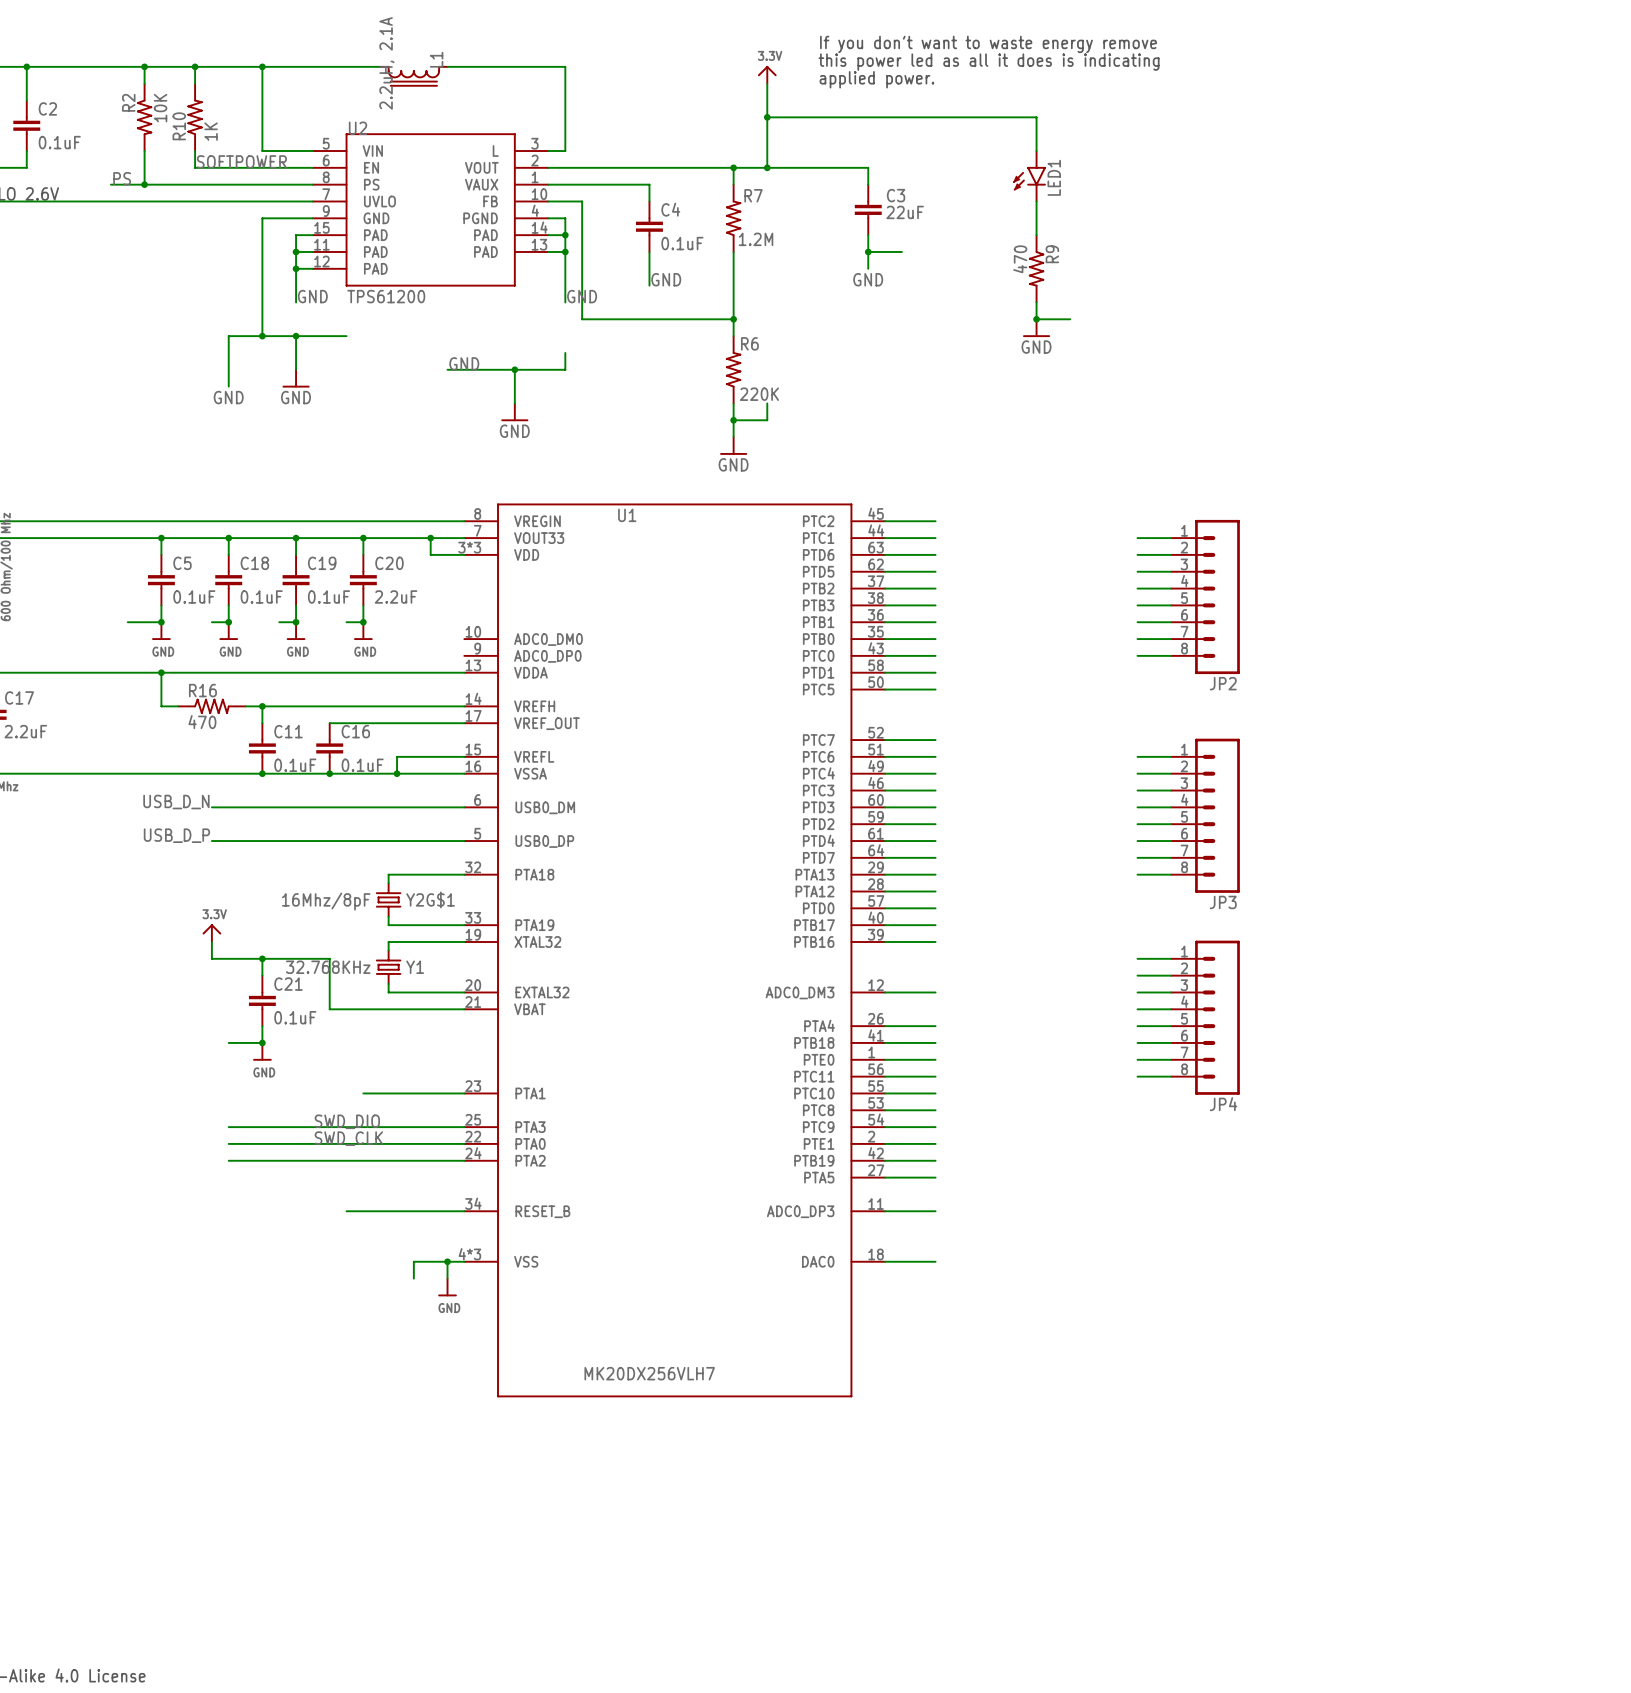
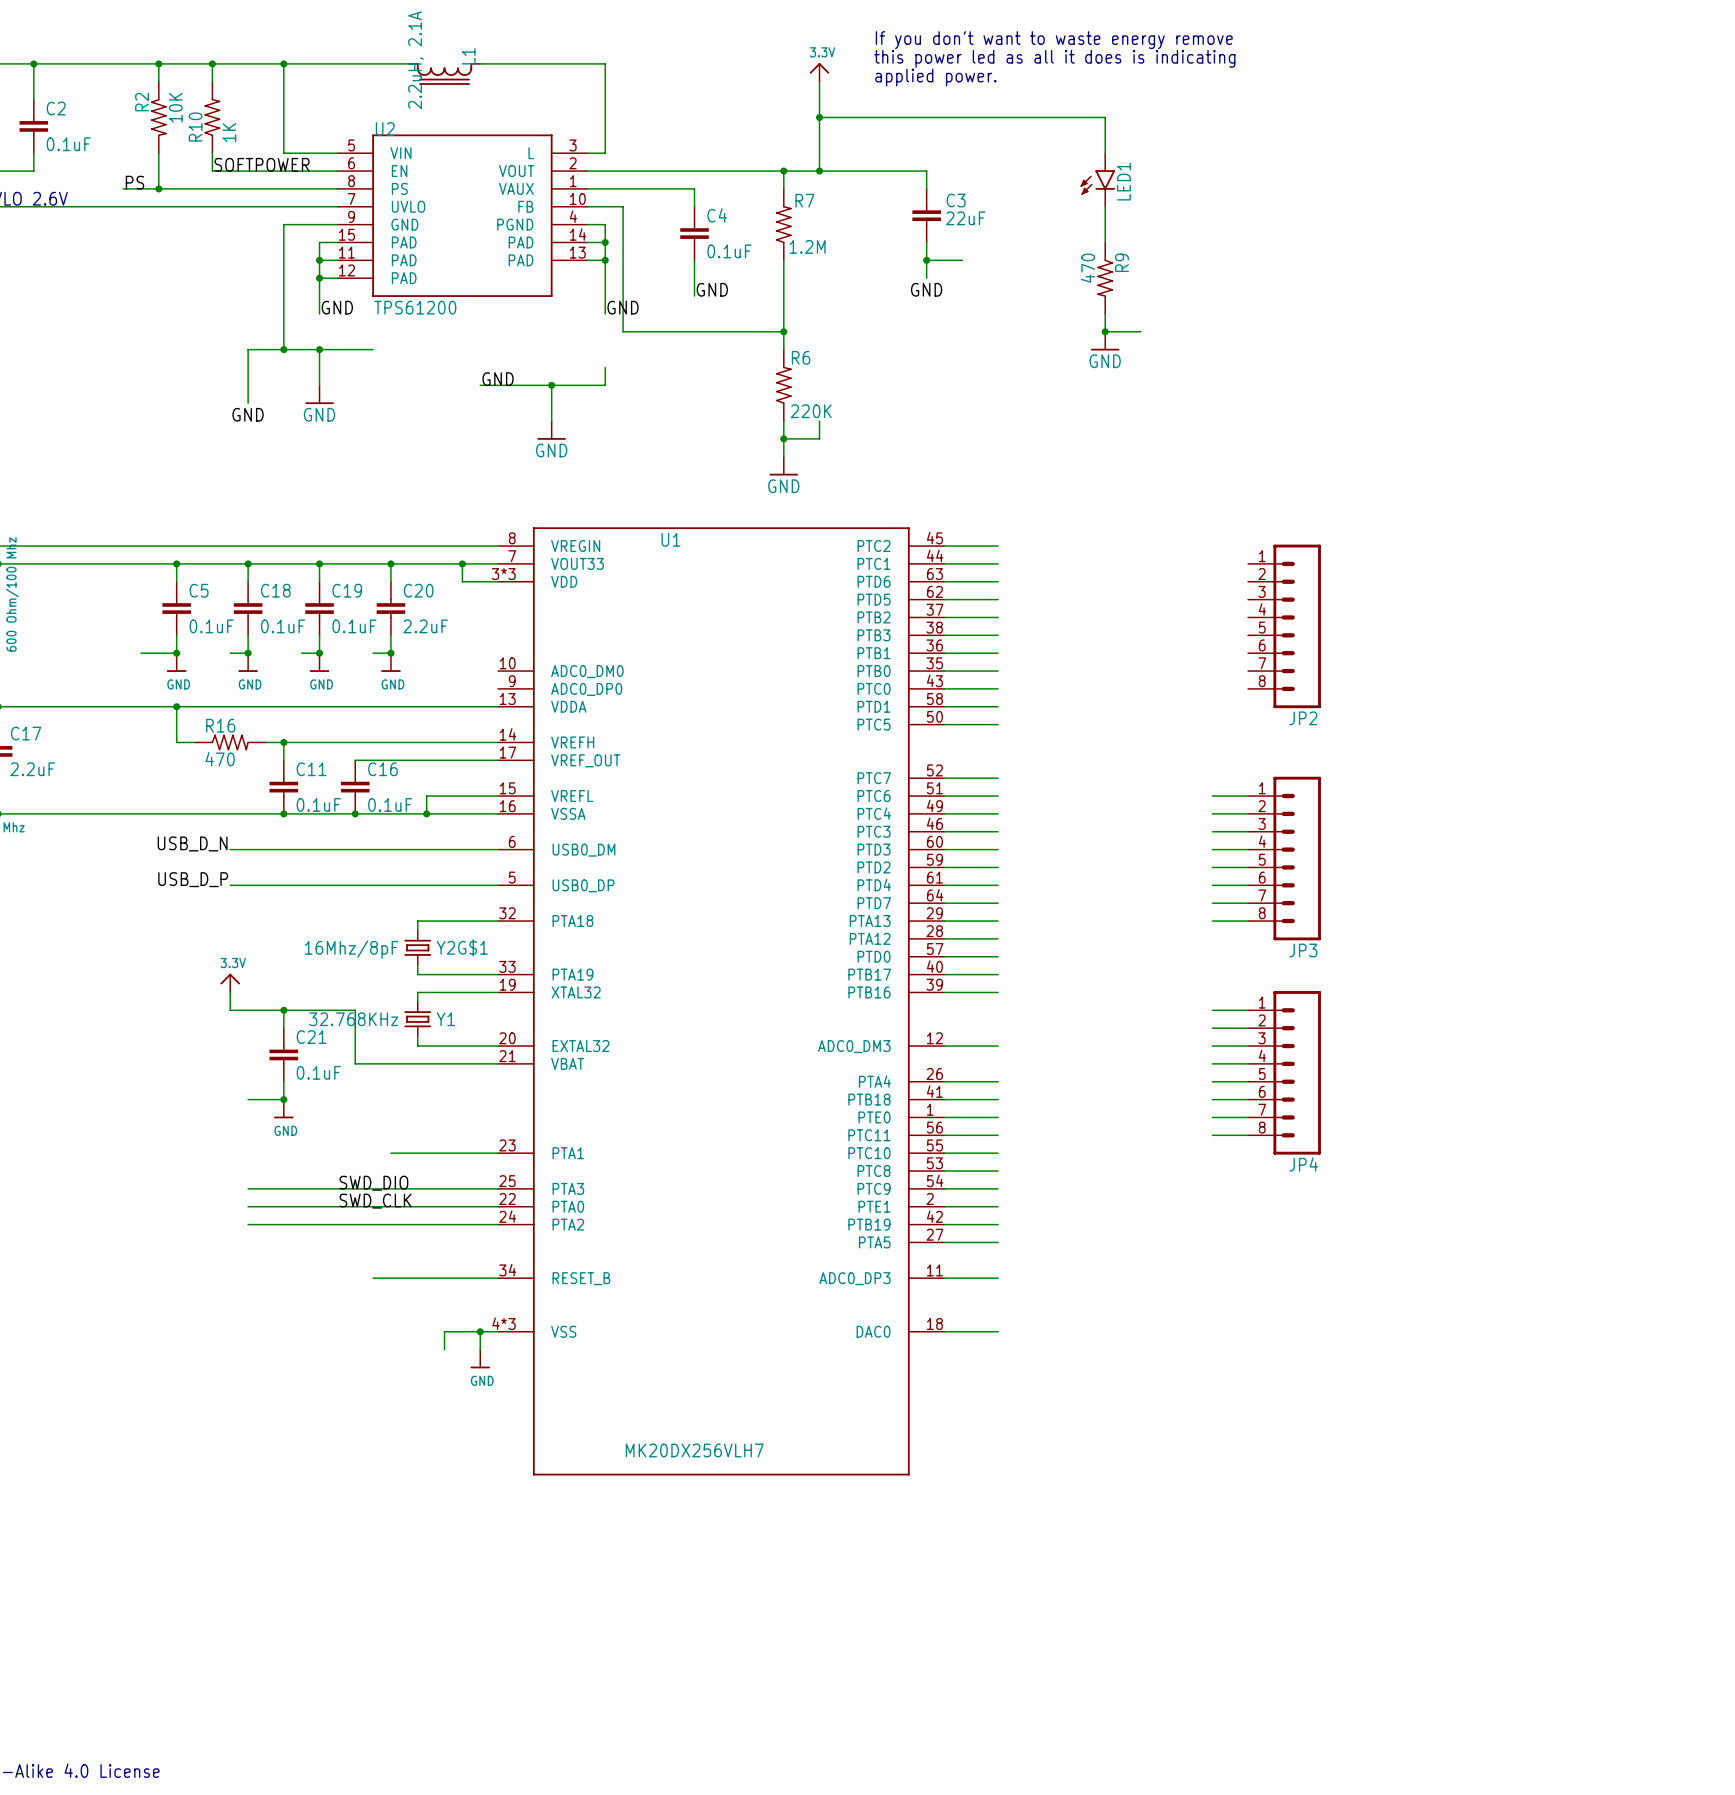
wire: (1137, 538) (1171, 538) -> none
wire: (1137, 554) (1171, 554) -> none
wire: (1137, 571) (1171, 571) -> none
wire: (1137, 588) (1171, 588) -> none
wire: (1137, 605) (1171, 605) -> none
wire: (1137, 622) (1171, 622) -> none
wire: (1137, 639) (1171, 639) -> none
wire: (1137, 655) (1171, 655) -> none

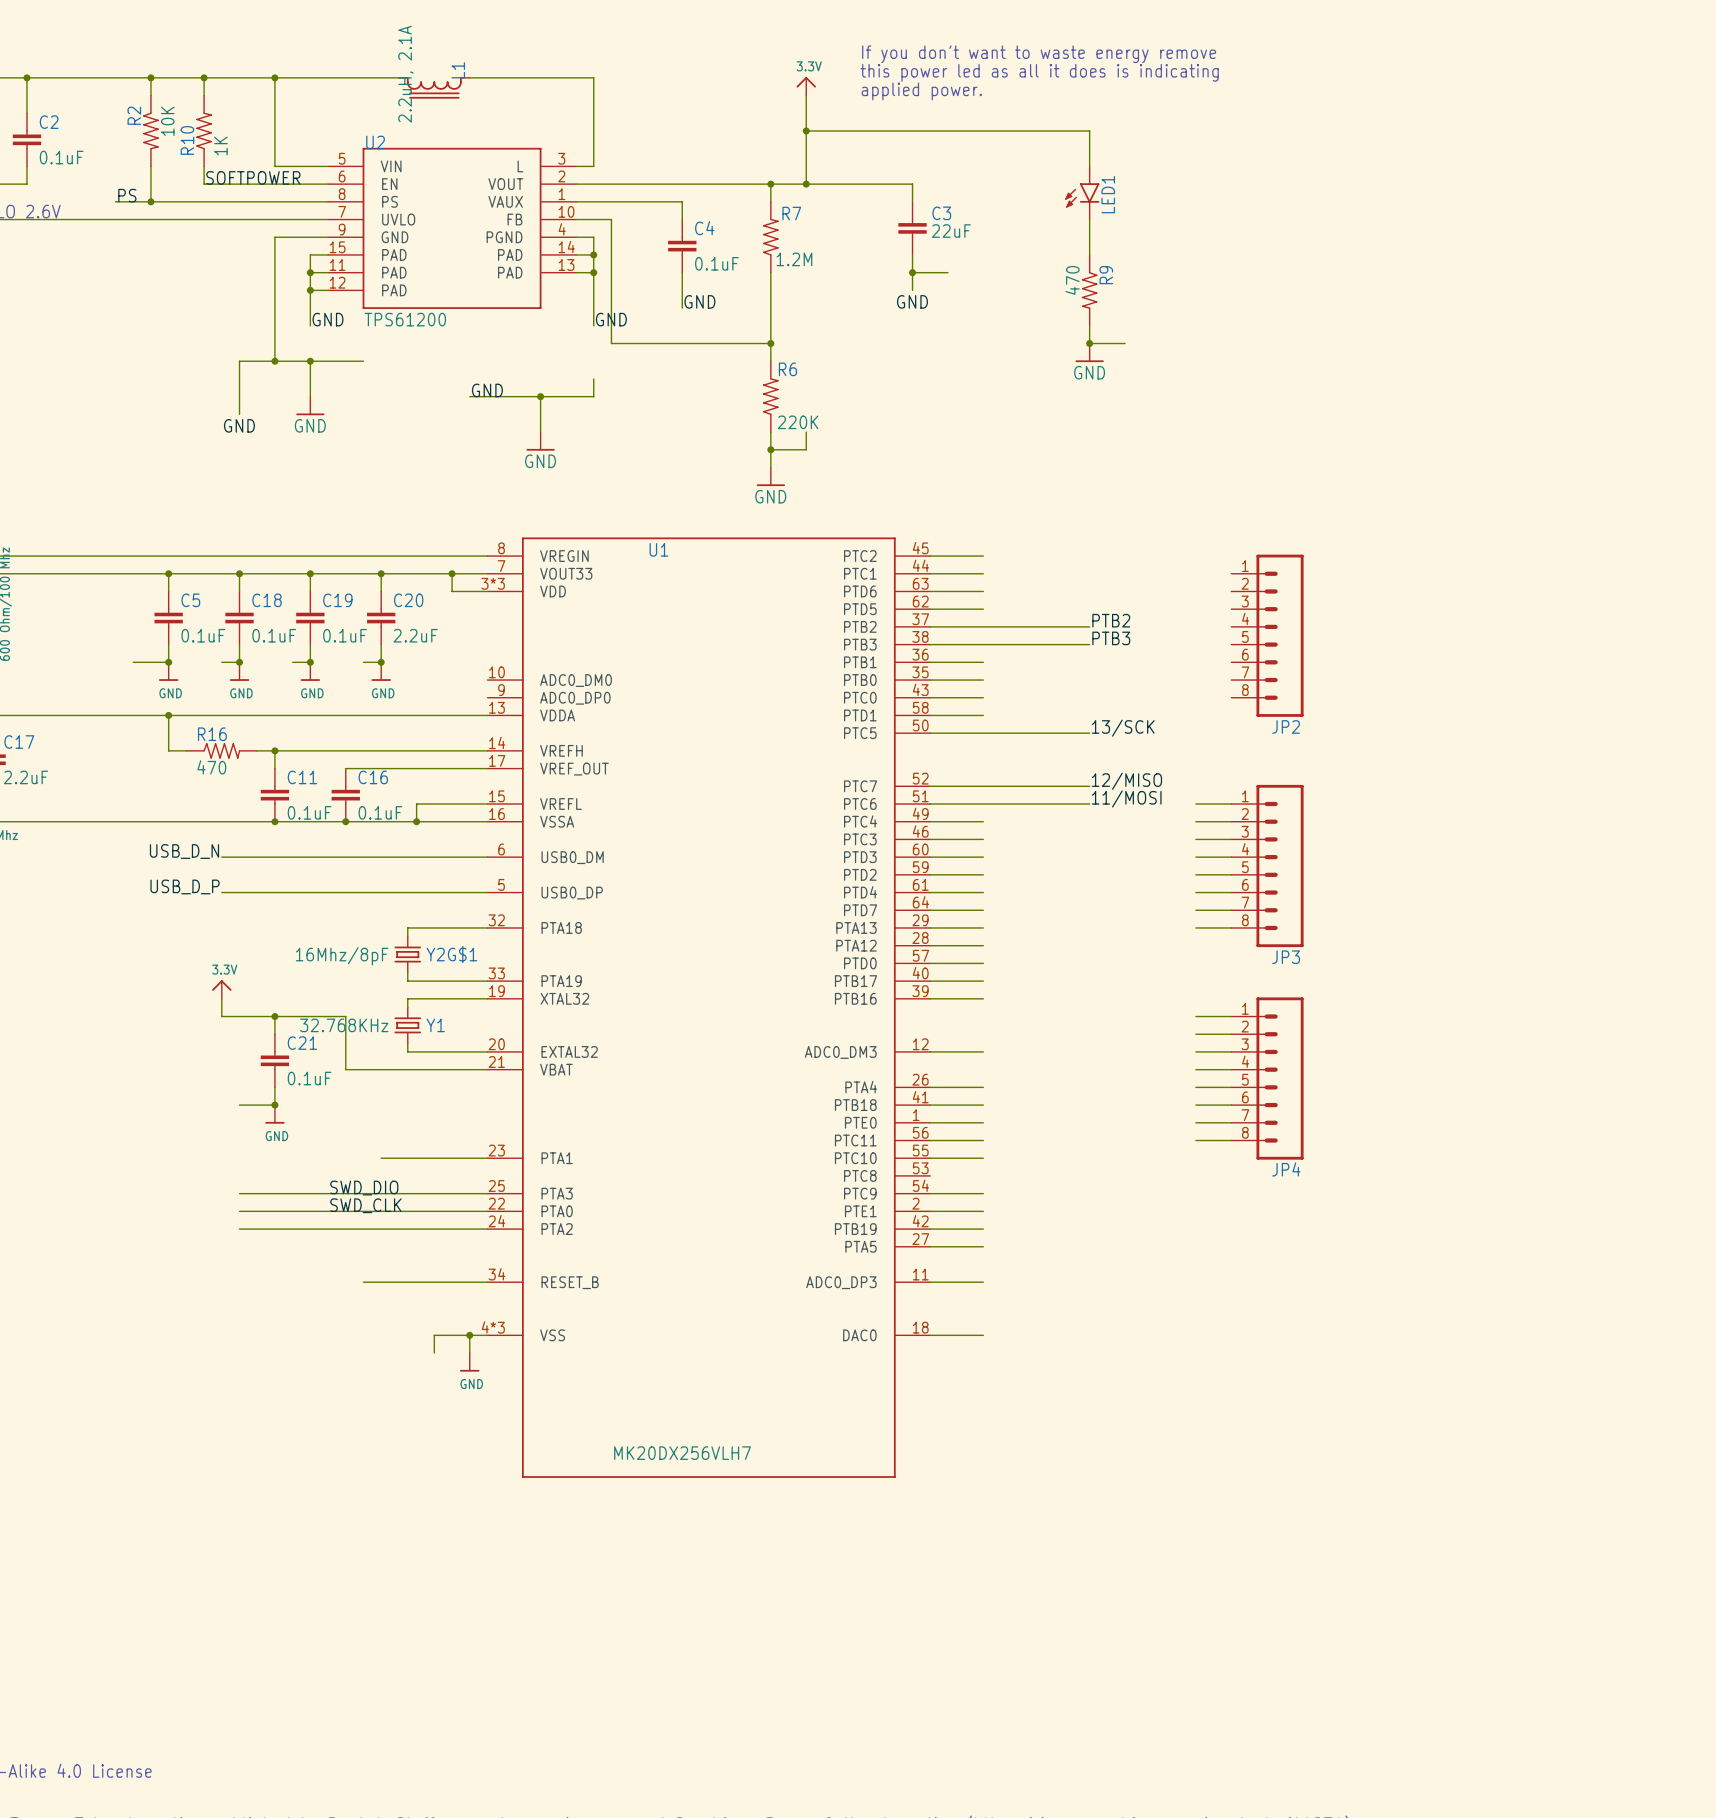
label: none -> PTB2 (1111, 620)
wire: none -> (983, 626) (1089, 626)
label: none -> PTB3 (1111, 638)
wire: none -> (983, 644) (1089, 644)
label: none -> 13/SCK (1123, 728)
wire: none -> (983, 733) (1089, 733)
label: none -> 12/MISO (1126, 781)
wire: none -> (983, 786) (1089, 786)
label: none -> 11/MOSI (1126, 798)
wire: none -> (983, 804) (1089, 804)
wire: (944, 1171) (998, 1171) -> none

